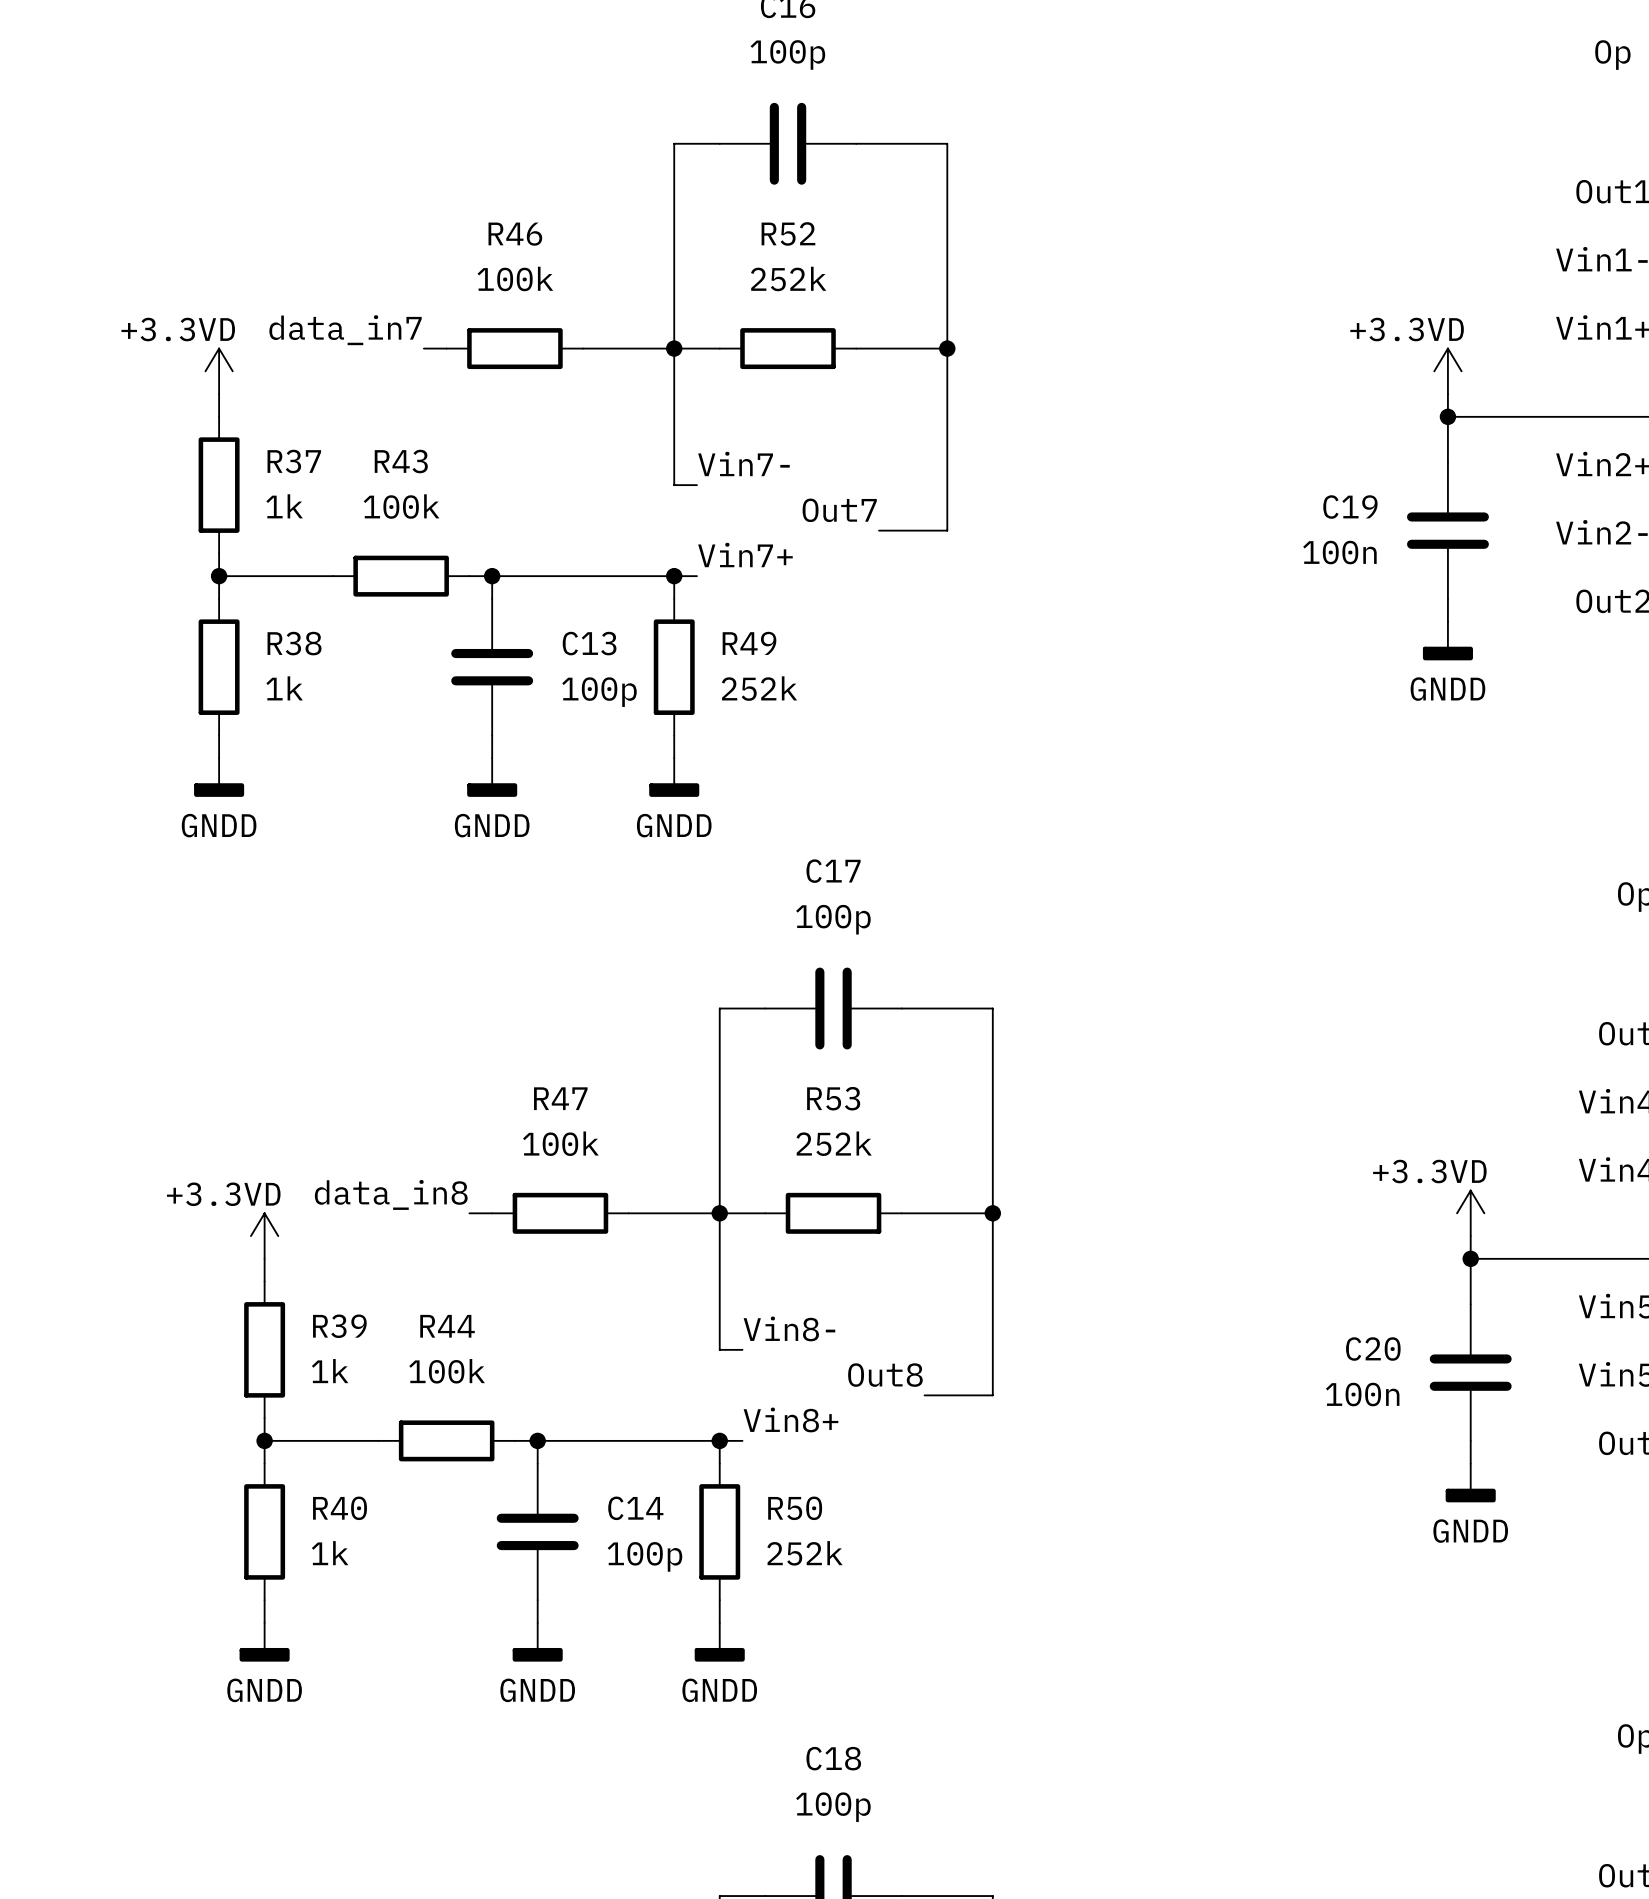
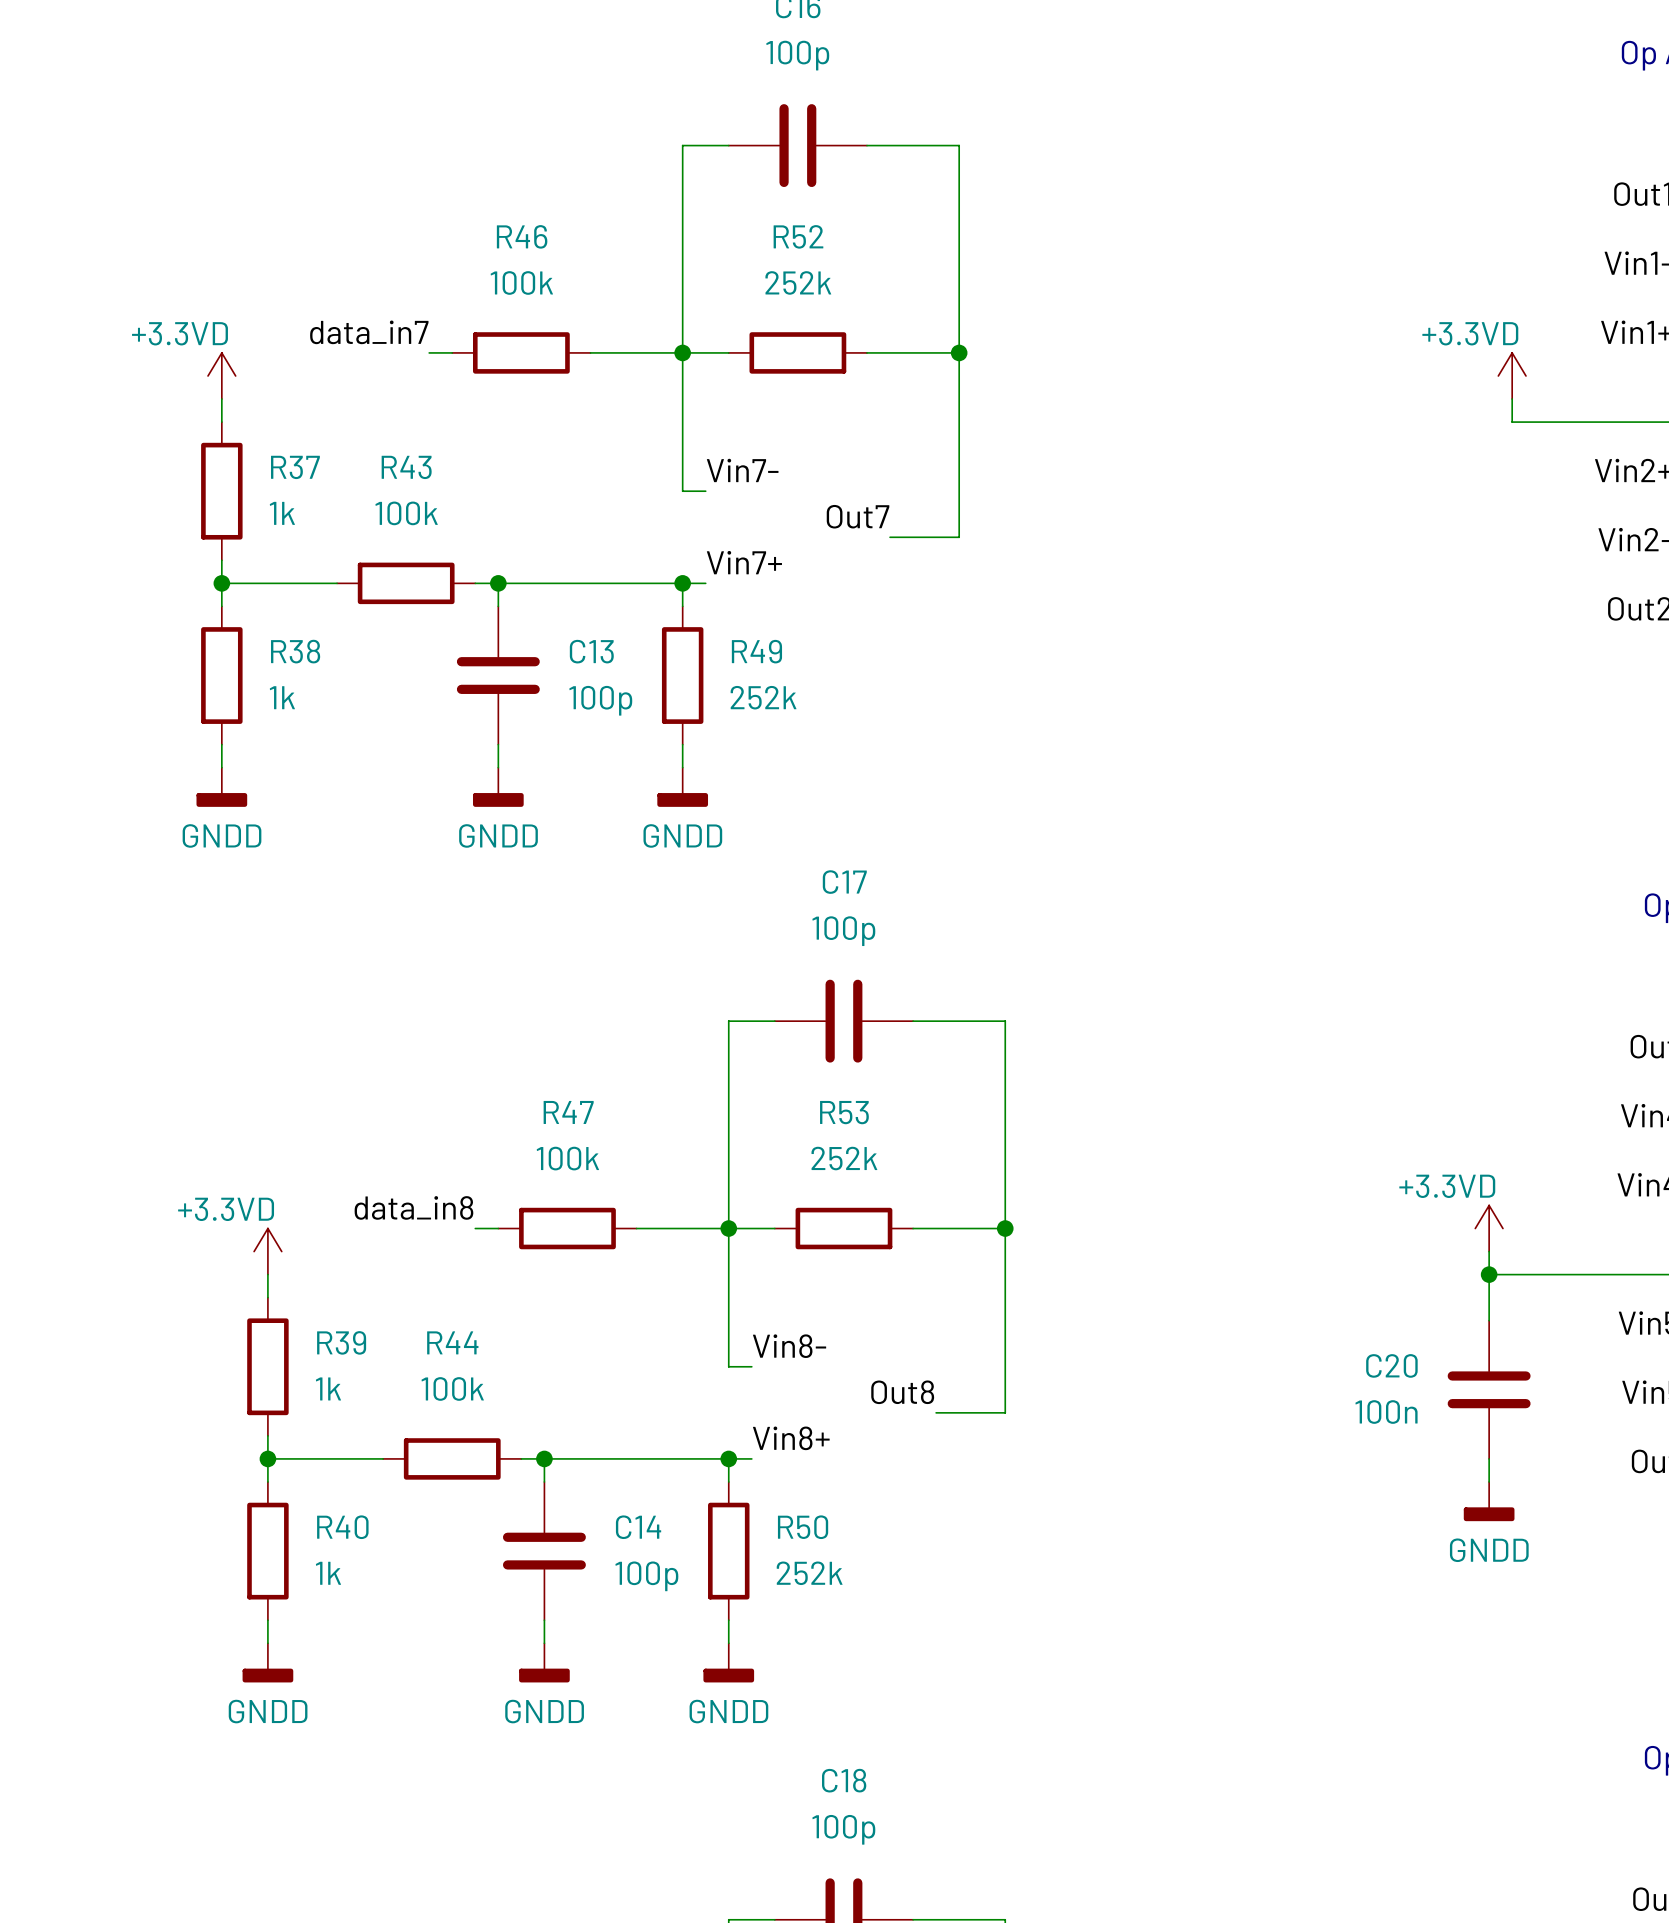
power symbol position: +3.3VD (1447, 371) -> +3.3VD (1512, 375)
wire: (1447, 394) (1447, 462) -> none
wire: (1447, 416) (1493, 416) -> (1512, 399) (1512, 422)
junction: (1447, 416) -> none
C19: 100n (1447, 530) -> none
wire: (1447, 598) (1447, 621) -> none
power symbol: GNDD (1447, 641) -> none

